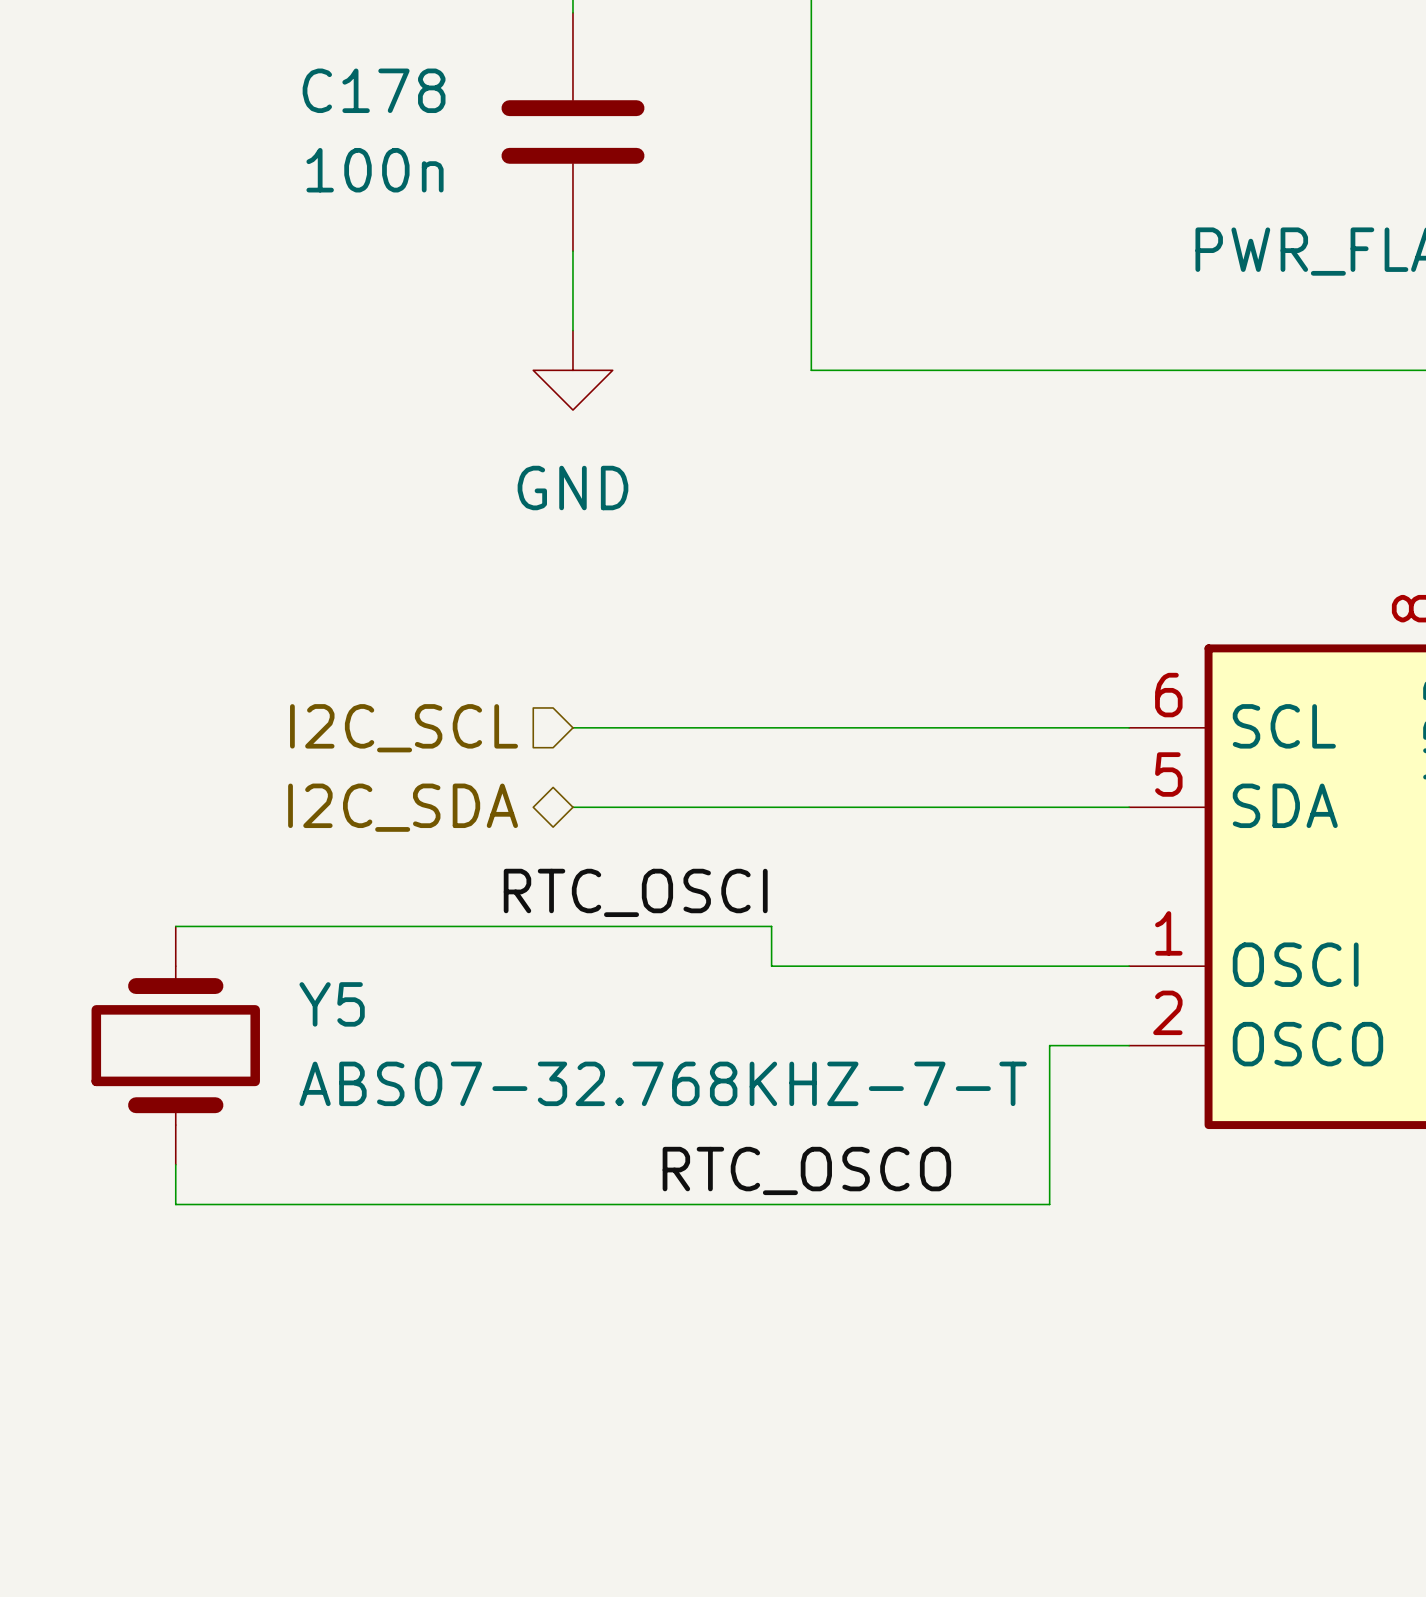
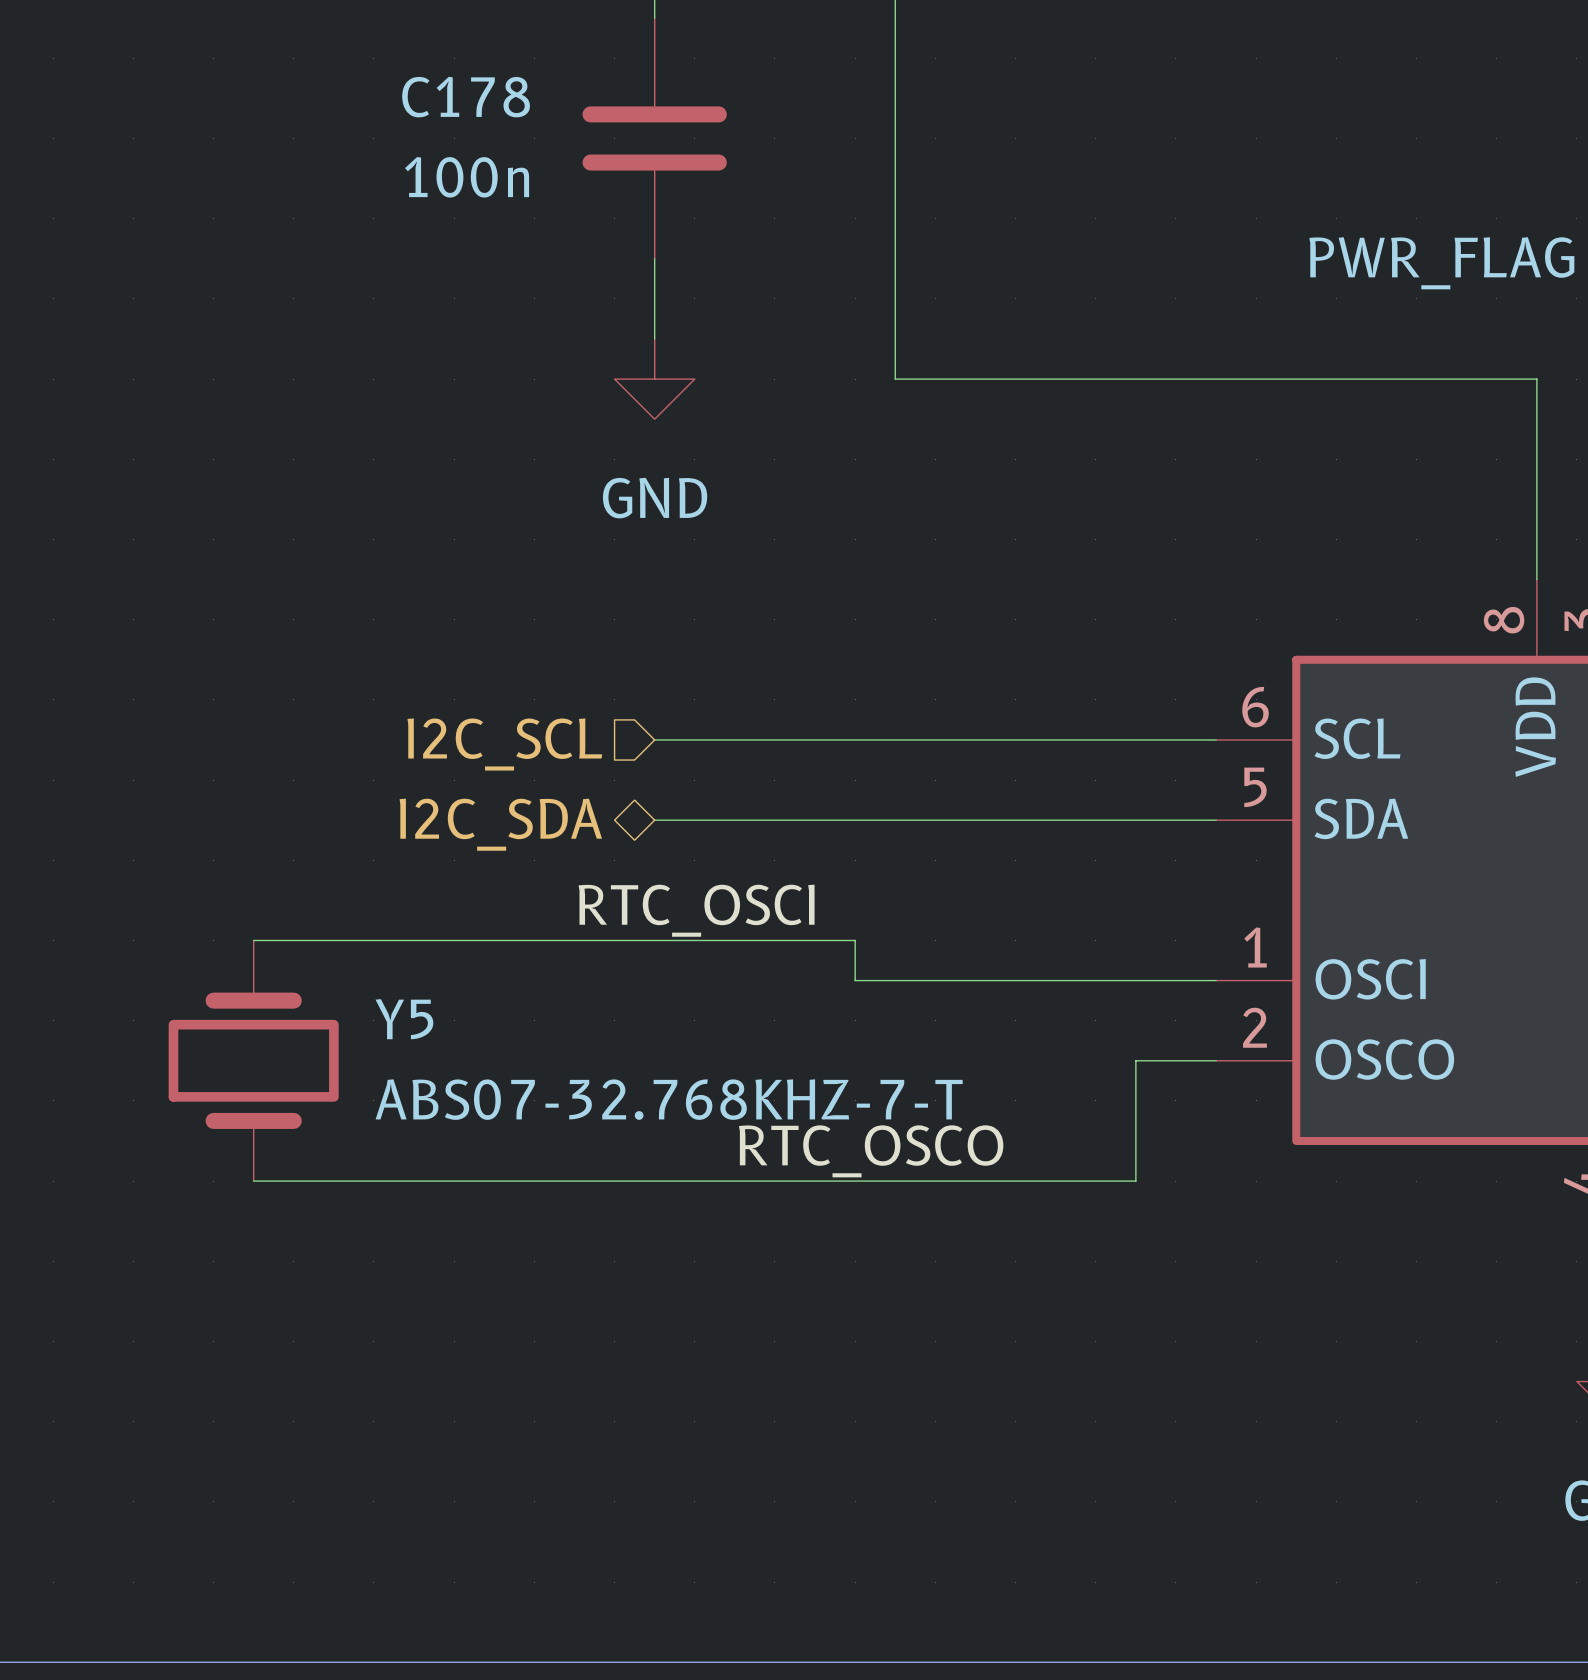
wire: (175, 1164) (175, 1204) (1049, 1204) (1049, 1164) -> (253, 1181) (1135, 1181)
label position: RTC_OSCO (806, 1170) -> RTC_OSCO (871, 1151)

